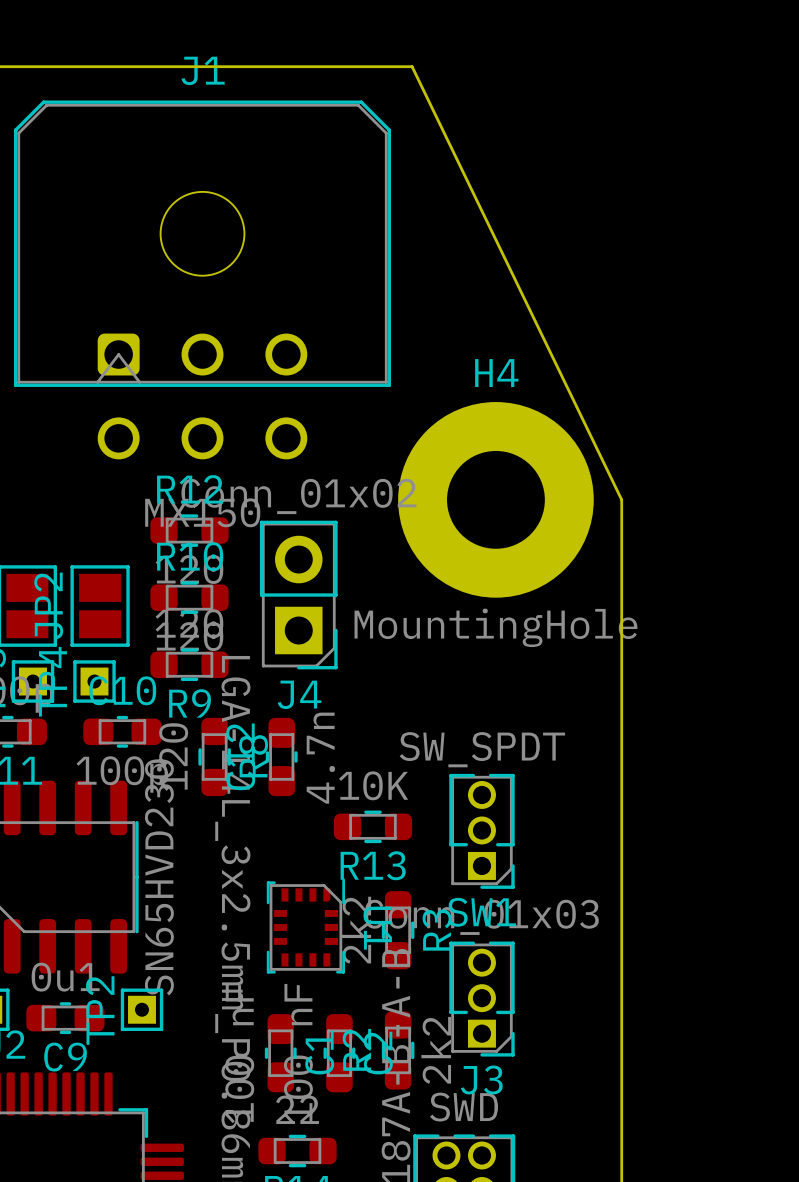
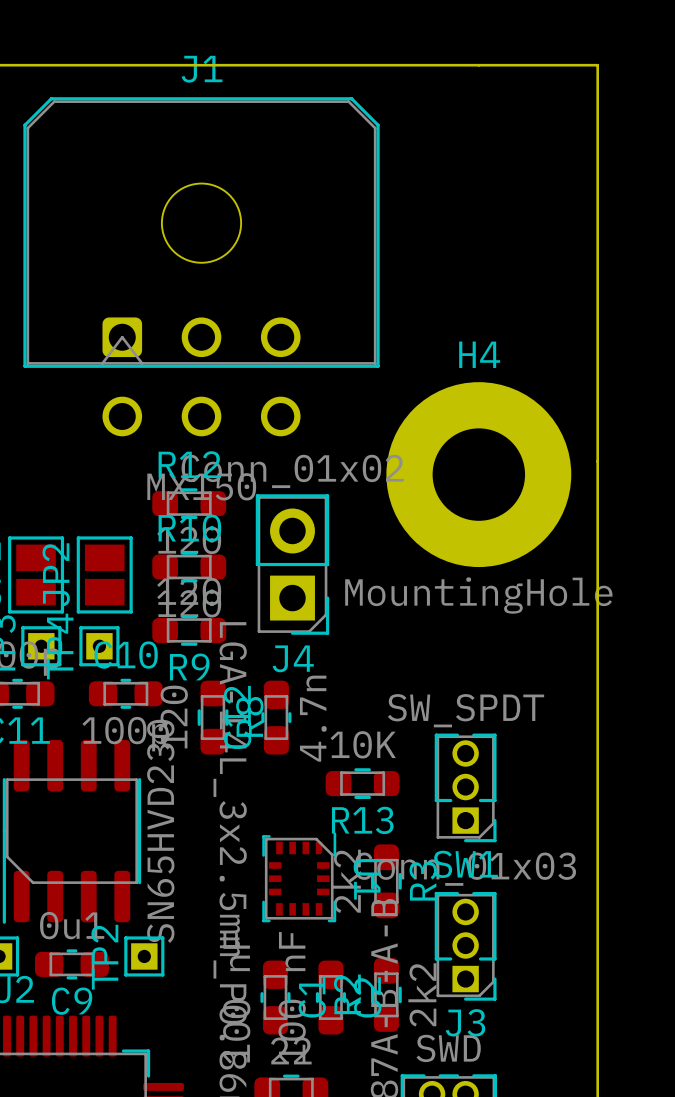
board edge: (412, 66) (621, 499) -> (399, 65) (597, 65) (597, 474)

